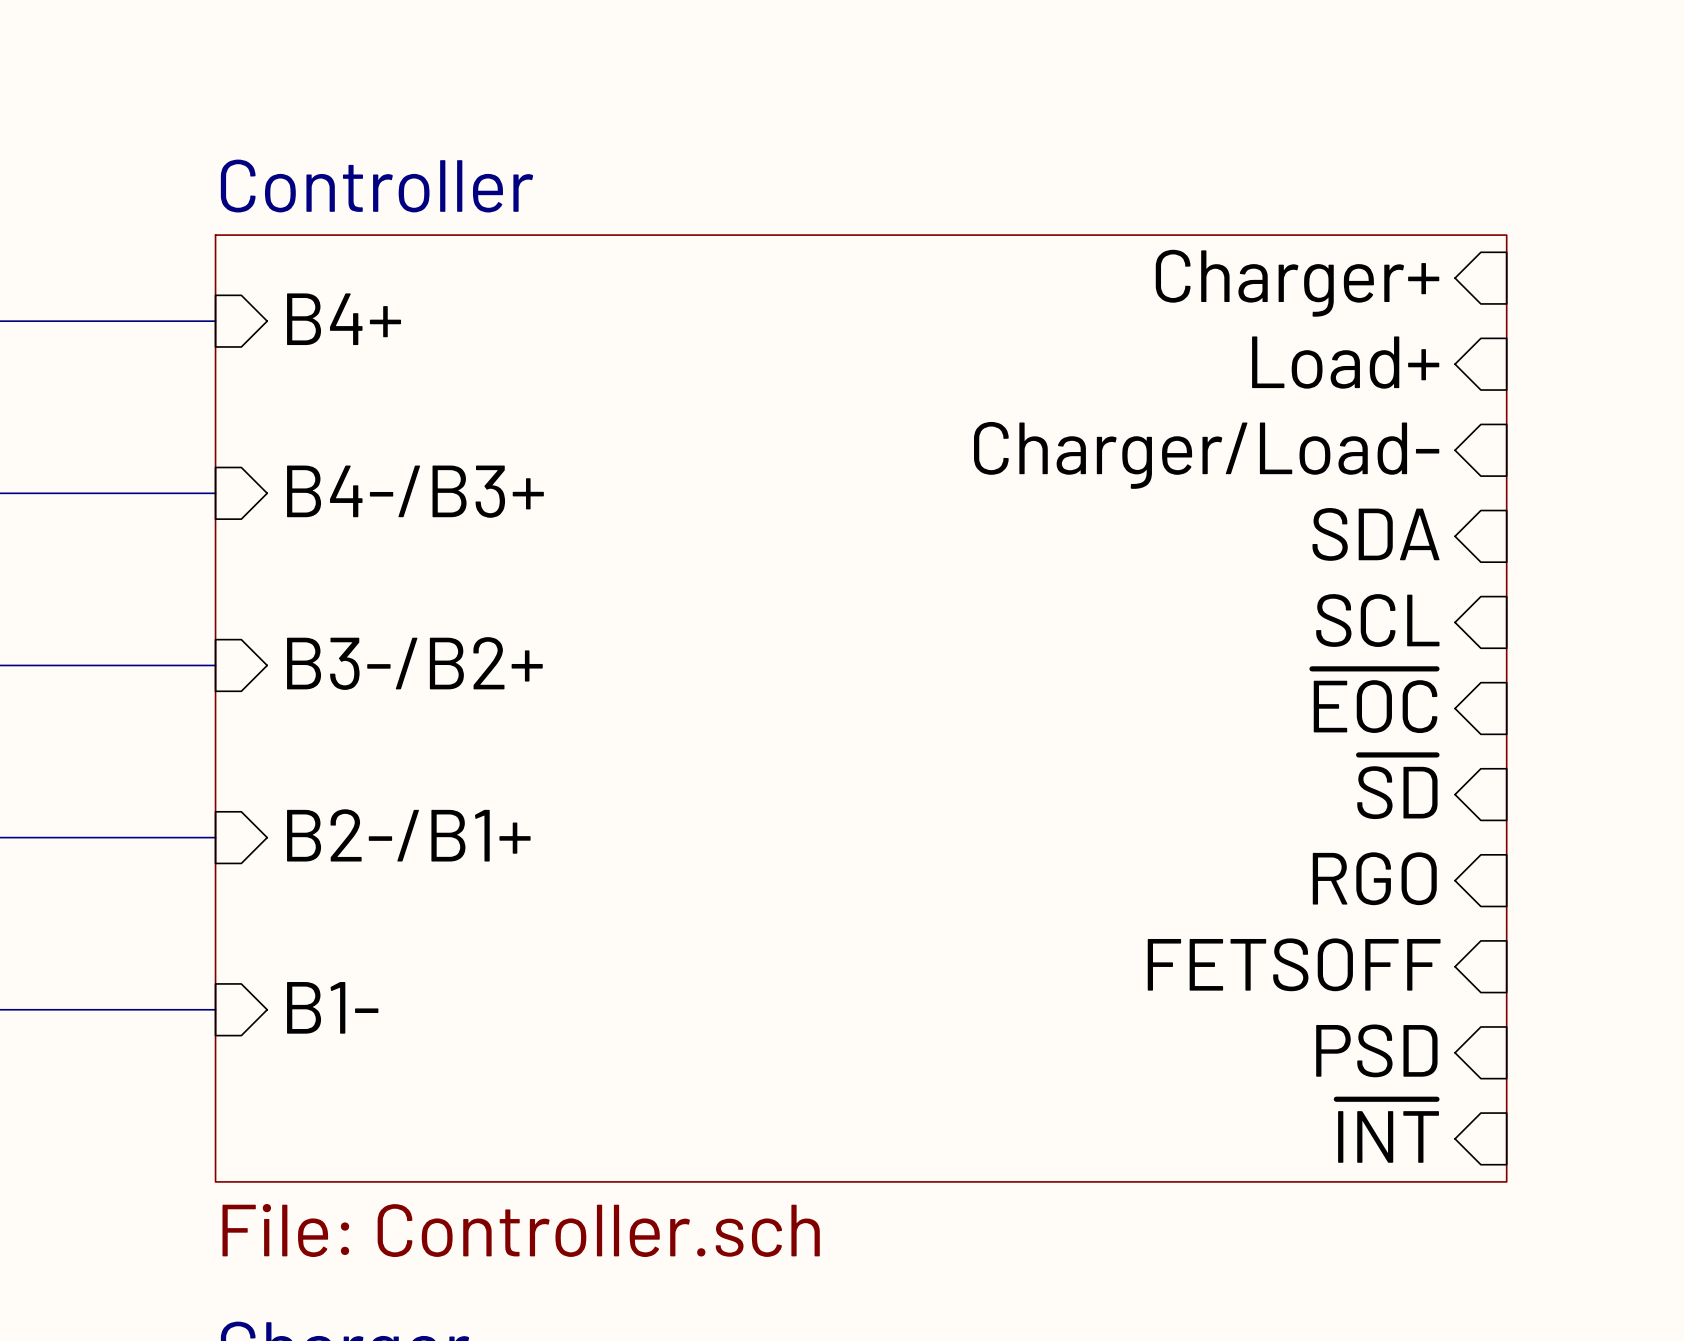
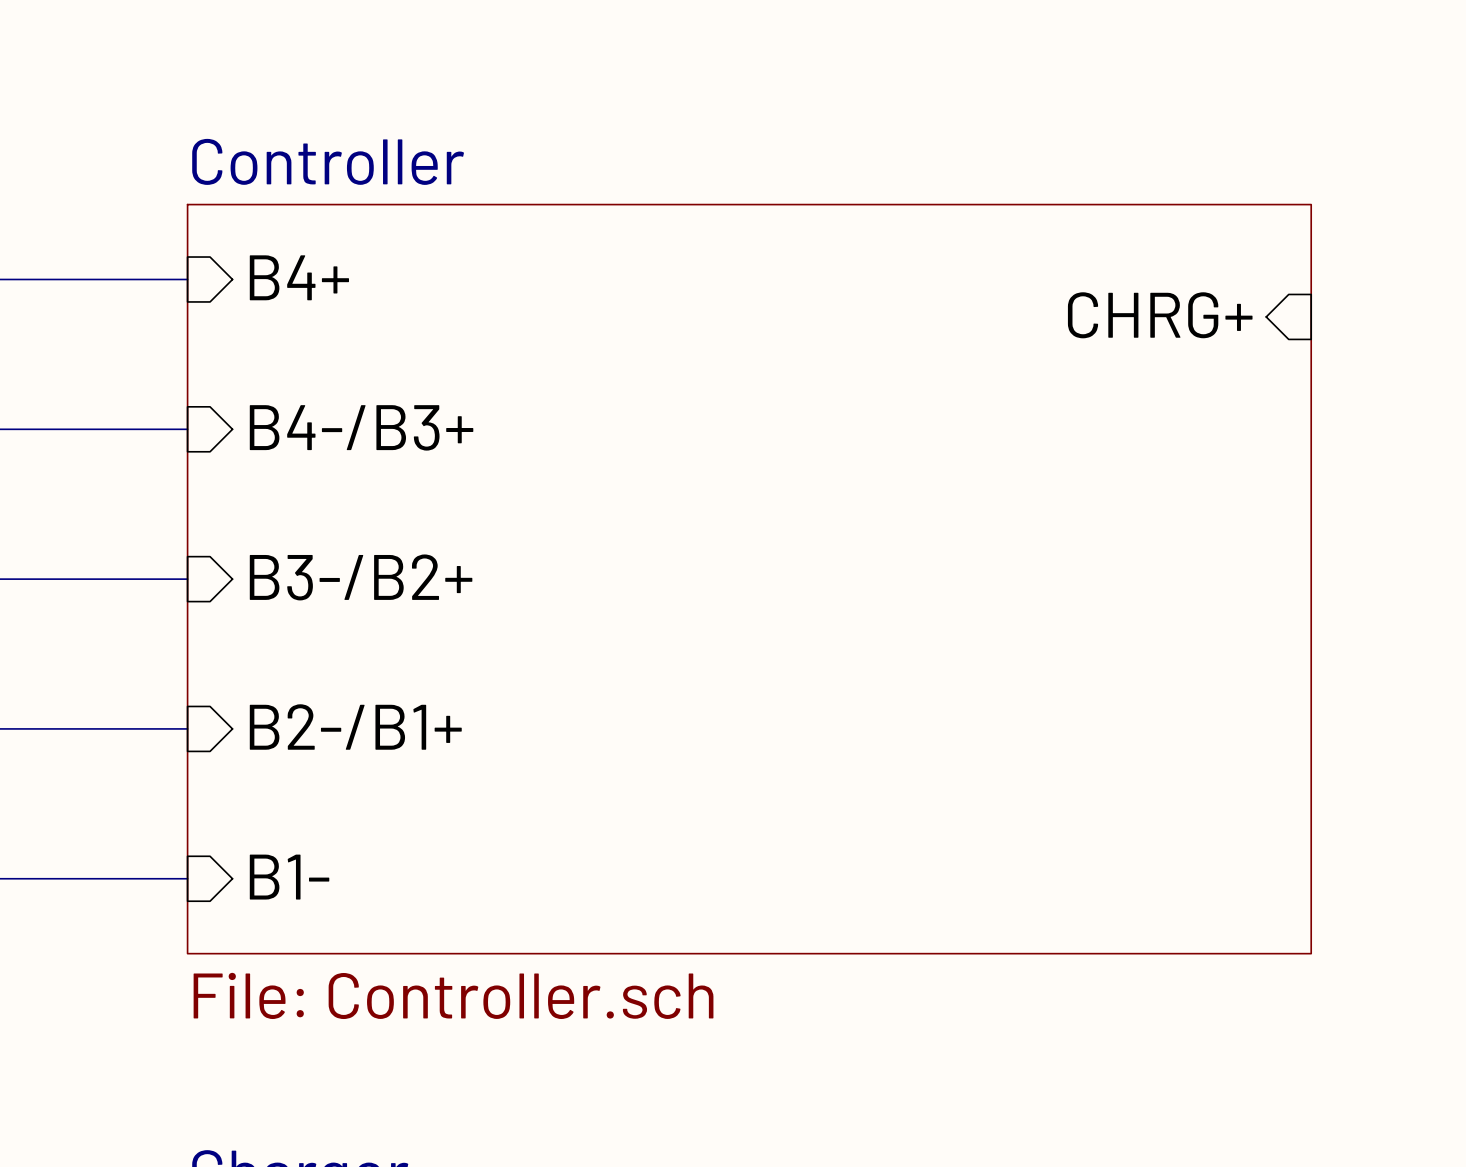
sheet pin: Charger+ (1297, 283) -> none
sheet pin: Load+ (1345, 362) -> CHRG+ (1160, 315)
sheet pin: Charger/Load- (1206, 455) -> none
sheet pin: SDA (1376, 534) -> none
sheet pin: SCL (1377, 620) -> none
sheet Controller: none -> File: Controller.sch (749, 579)
sheet pin: ~{EOC} (1374, 700) -> none
sheet Controller: File: Controller.sch (861, 708) -> none
sheet pin: ~{SD} (1397, 787) -> none
sheet pin: RGO (1374, 878) -> none
sheet pin: FETSOFF (1294, 964) -> none
sheet pin: PSD (1376, 1050) -> none
sheet pin: ~{INT} (1387, 1131) -> none

